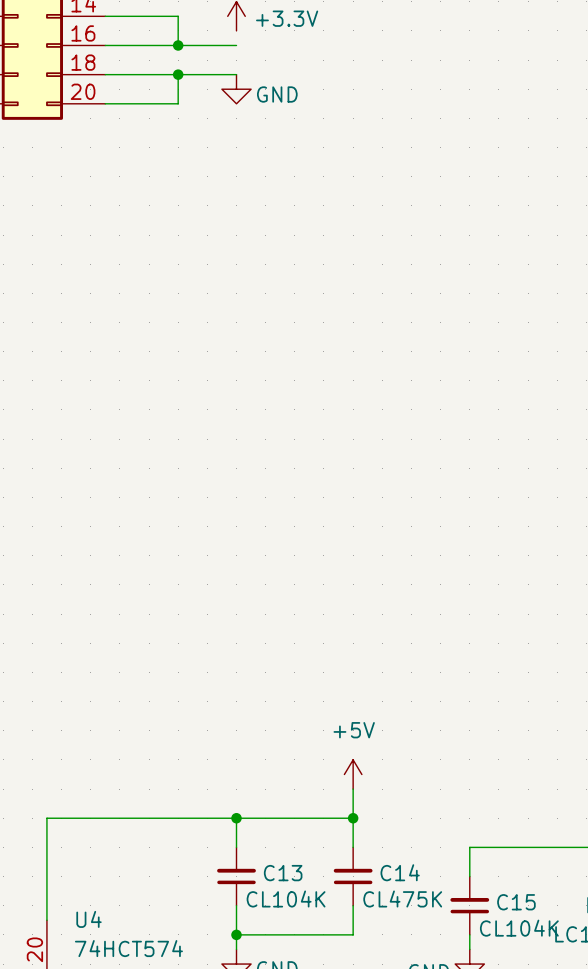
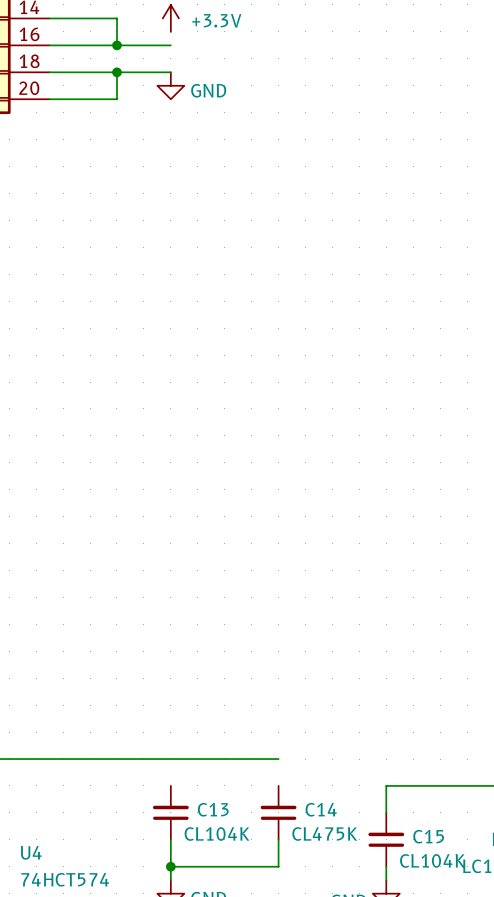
power symbol: +5V (353, 774) -> none
wire: (353, 789) (353, 847) -> none
wire: (236, 818) (236, 847) -> none
junction: (236, 818) -> none
junction: (353, 818) -> none

